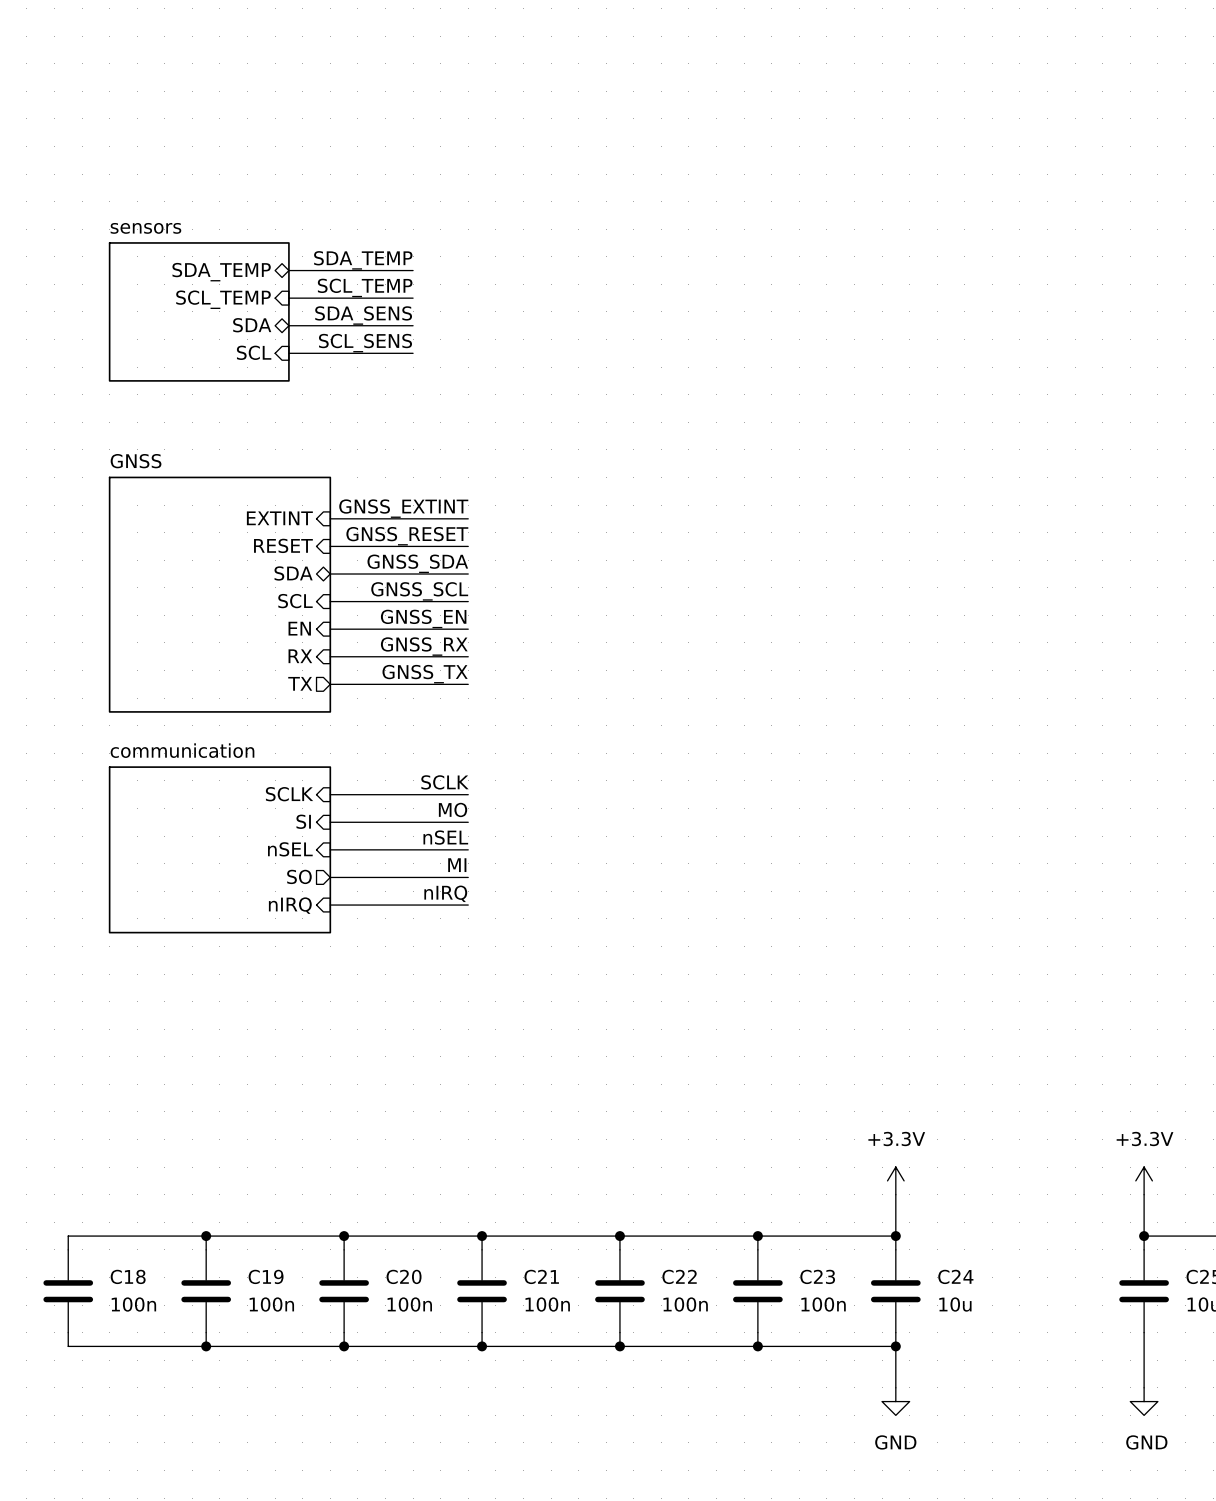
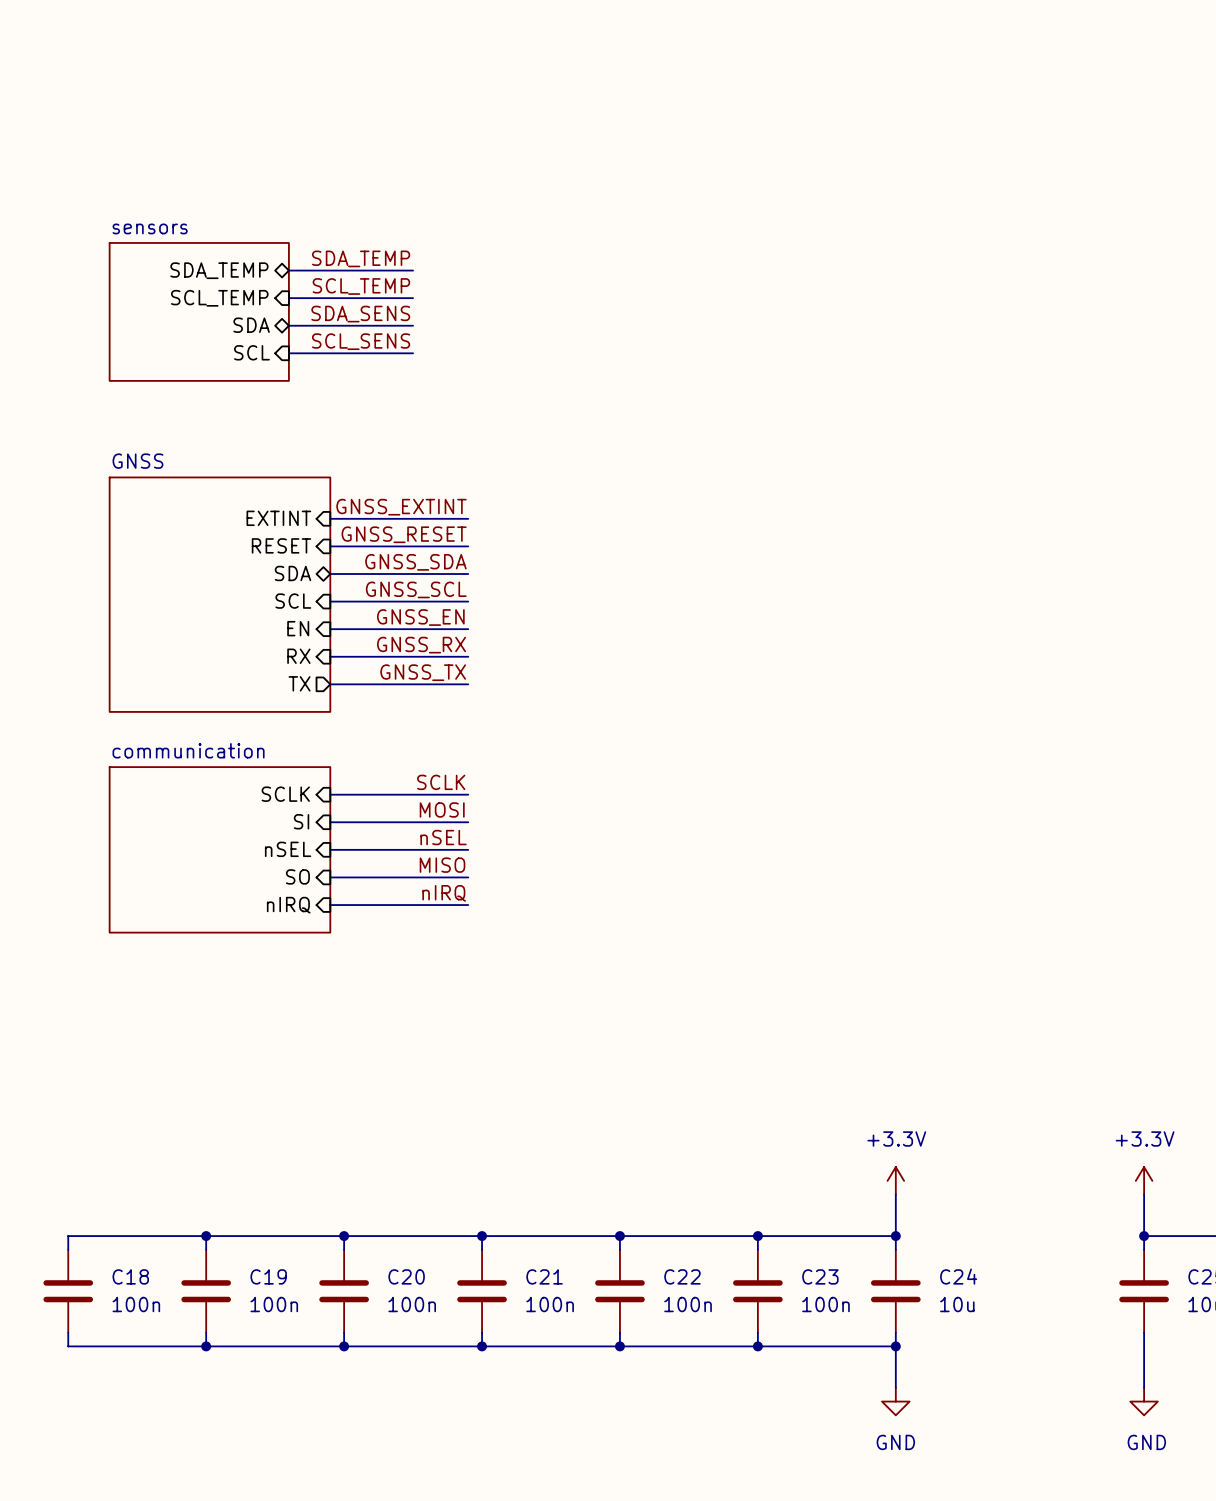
label: MO (453, 809) -> MOSI (442, 809)
label: MI (457, 865) -> MISO (442, 865)
sheet pin shape: output (299, 876) -> input (297, 876)

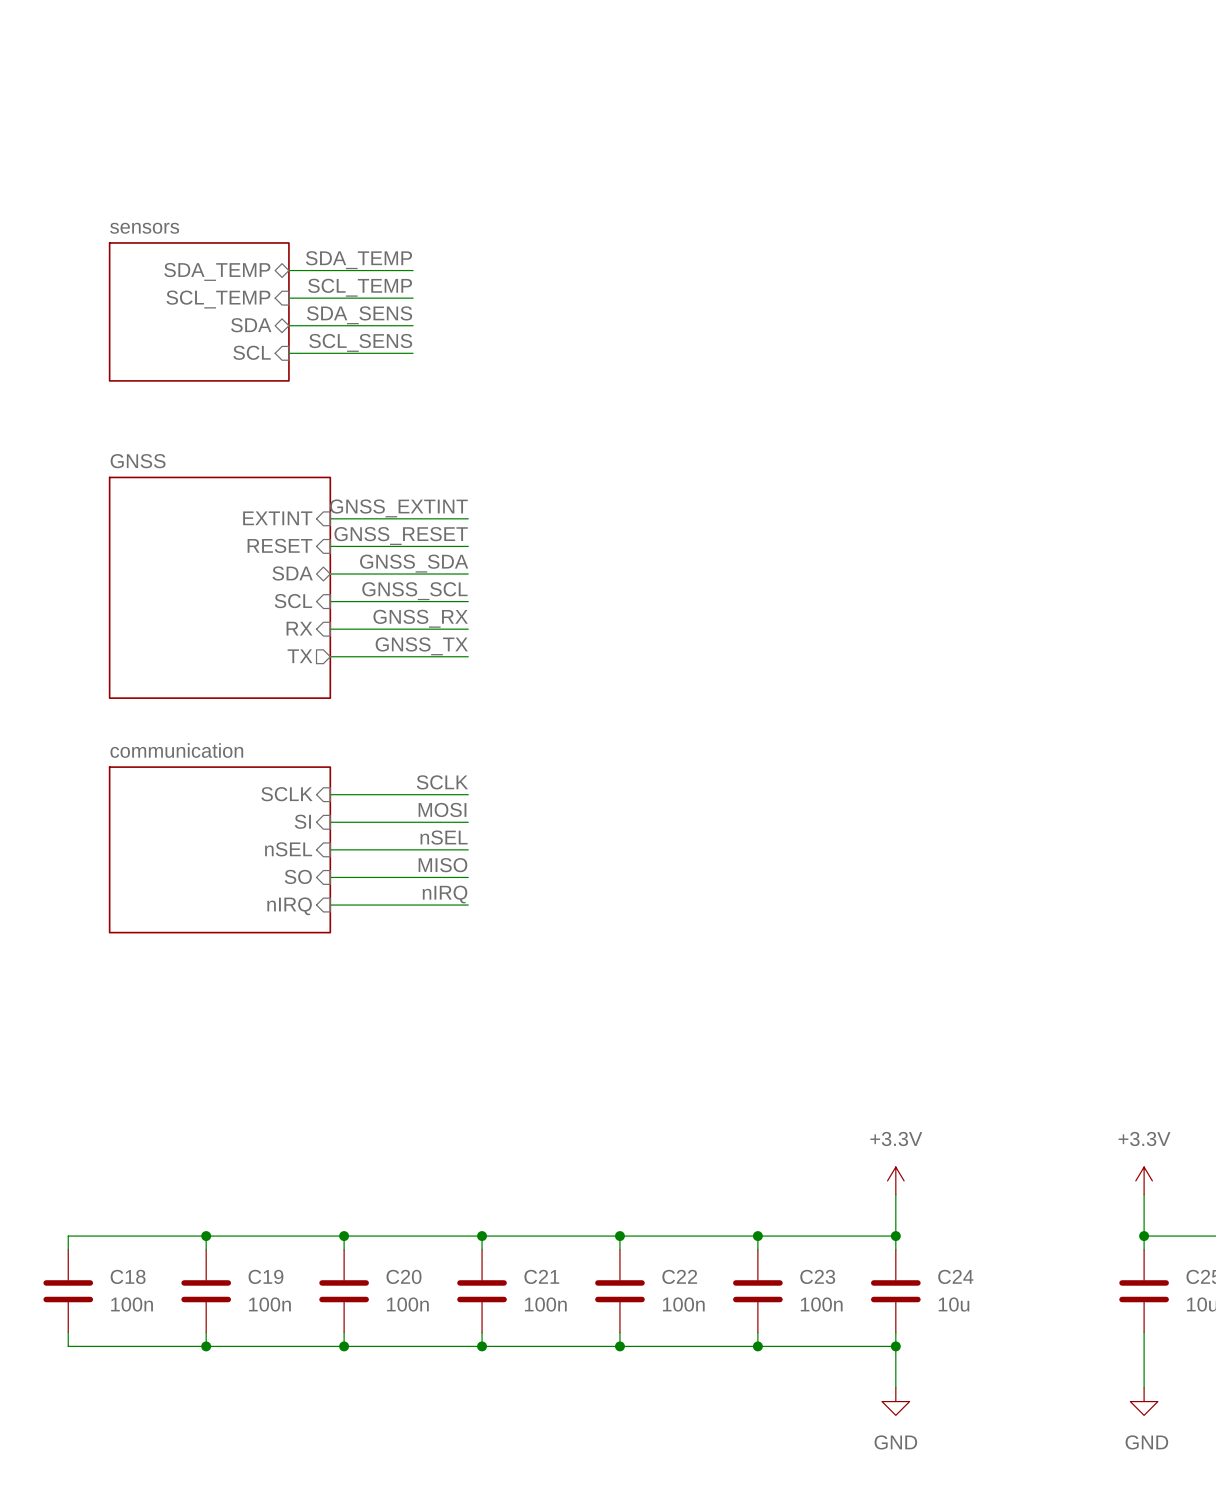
sheet GNSS shape: [108, 476, 332, 713] -> [108, 476, 332, 699]
label: GNSS_EN (420, 617) -> GNSS_RX (420, 618)
sheet pin: EN (298, 628) -> RX (299, 628)
label: GNSS_RX (421, 645) -> GNSS_TX (421, 646)
sheet pin shape: input (298, 656) -> output (300, 656)
sheet pin: RX (298, 656) -> TX (300, 656)
label: GNSS_TX (423, 672) -> none
sheet pin: TX (299, 683) -> none
wire: (330, 684) (468, 684) -> none

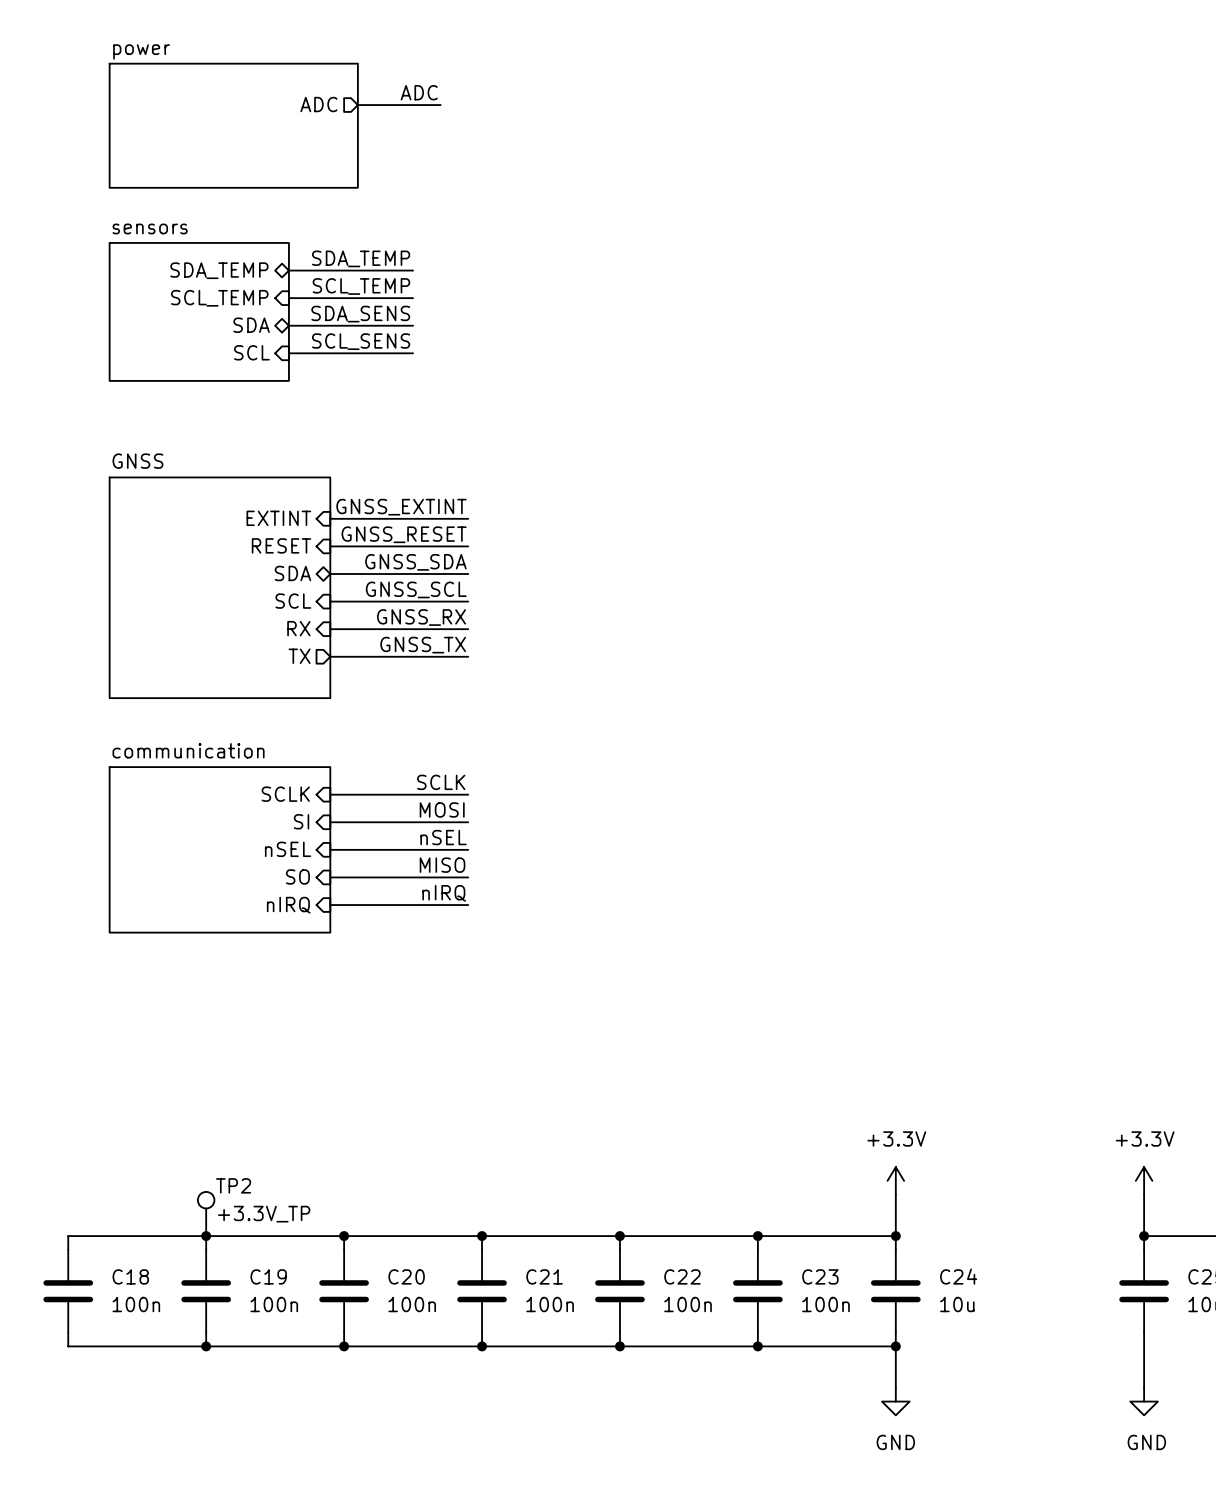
label: none -> ADC (419, 92)
sheet pin: none -> ADC (318, 104)
wire: none -> (357, 105) (440, 105)
sheet power: none -> (233, 125)
TP2: none -> +3.3V_TP (206, 1213)

